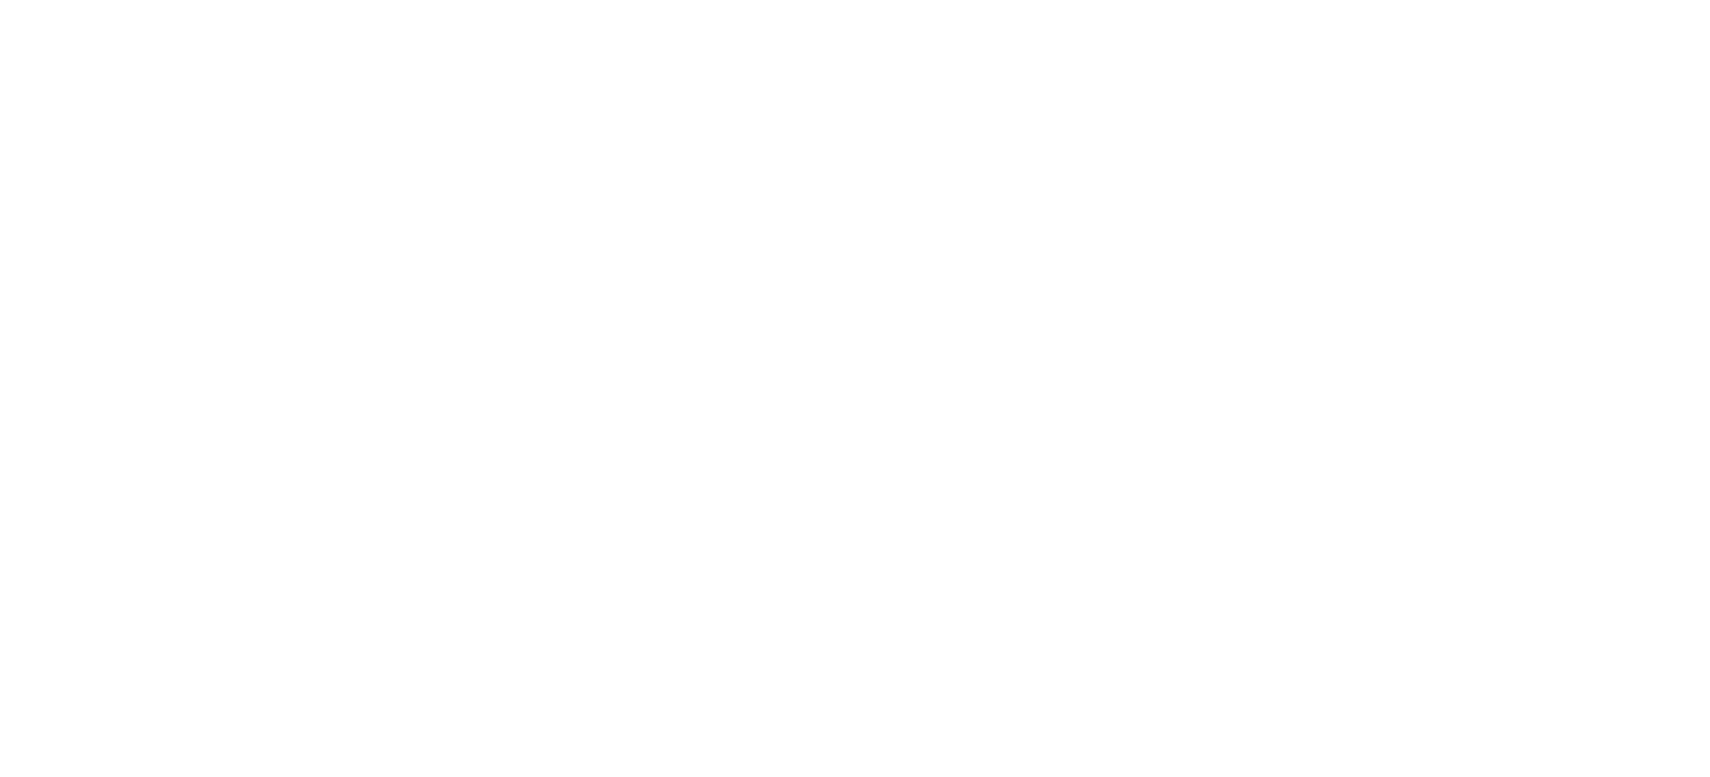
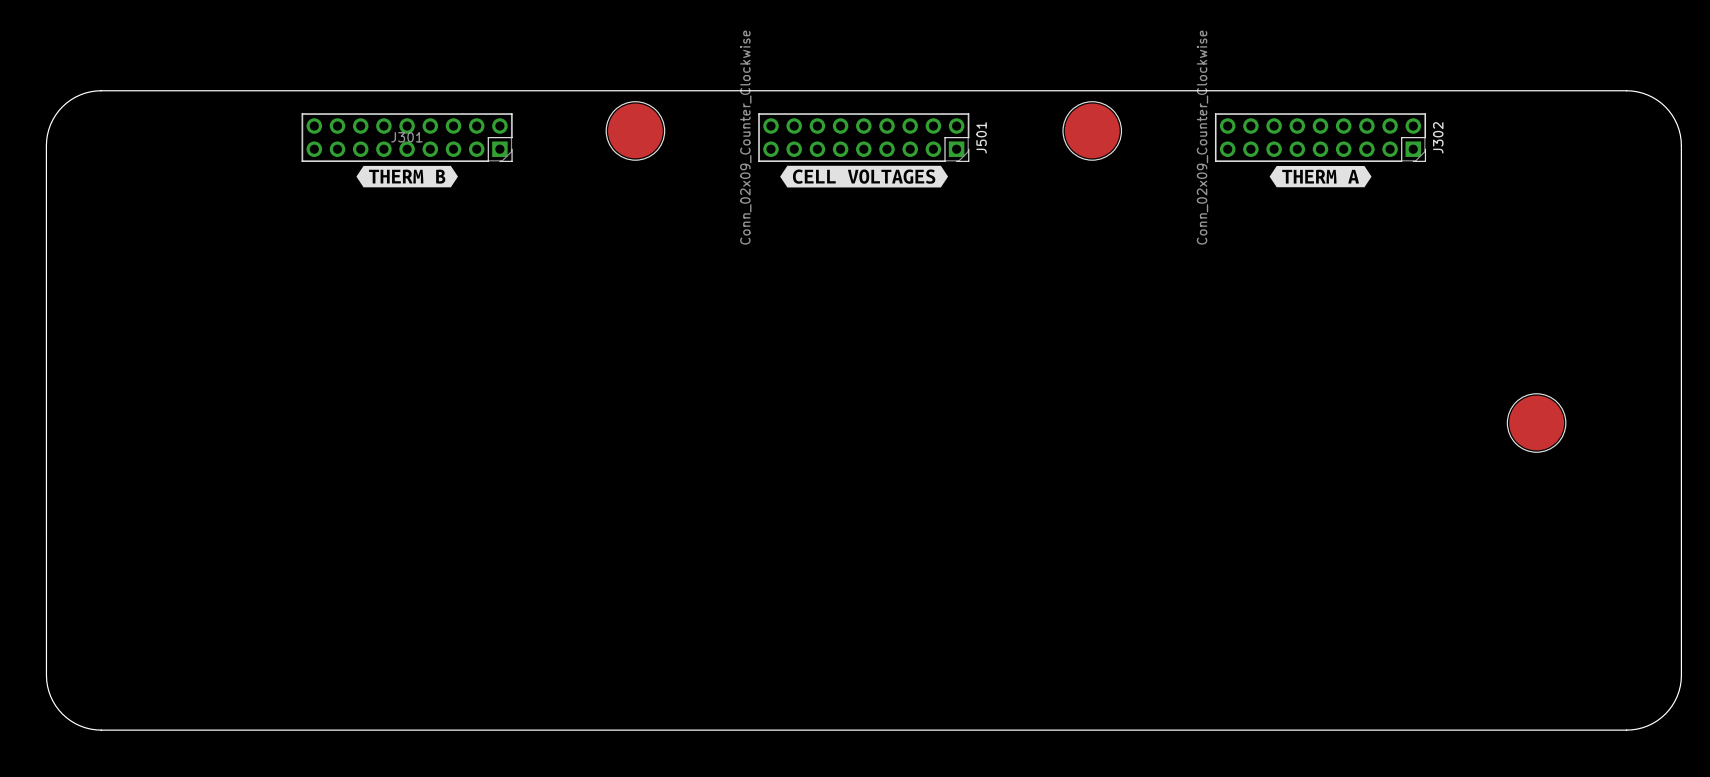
board edge: none -> (101, 90) (1626, 90) (1647, 94) (1657, 99) (1668, 110) (1677, 124) (1681, 140) (1681, 675) (1677, 696) (1668, 710) (1657, 720) (1642, 727) (1626, 730) (101, 730) (80, 725) (66, 717) (58, 710) (50, 696) (46, 680) (46, 145) (50, 124) (62, 106) (80, 94) (101, 90)
part: none -> (635, 130)
part: none -> (1092, 130)
J301: none -> (407, 137)
J501: none -> Conn_02x09_Counter_Clockwise (863, 137)
J302: none -> Conn_02x09_Counter_Clockwise (1320, 137)
drawing: none -> [356, 165, 458, 188]
drawing: none -> [780, 165, 949, 188]
drawing: none -> [1269, 166, 1372, 188]
part: none -> (1536, 423)

